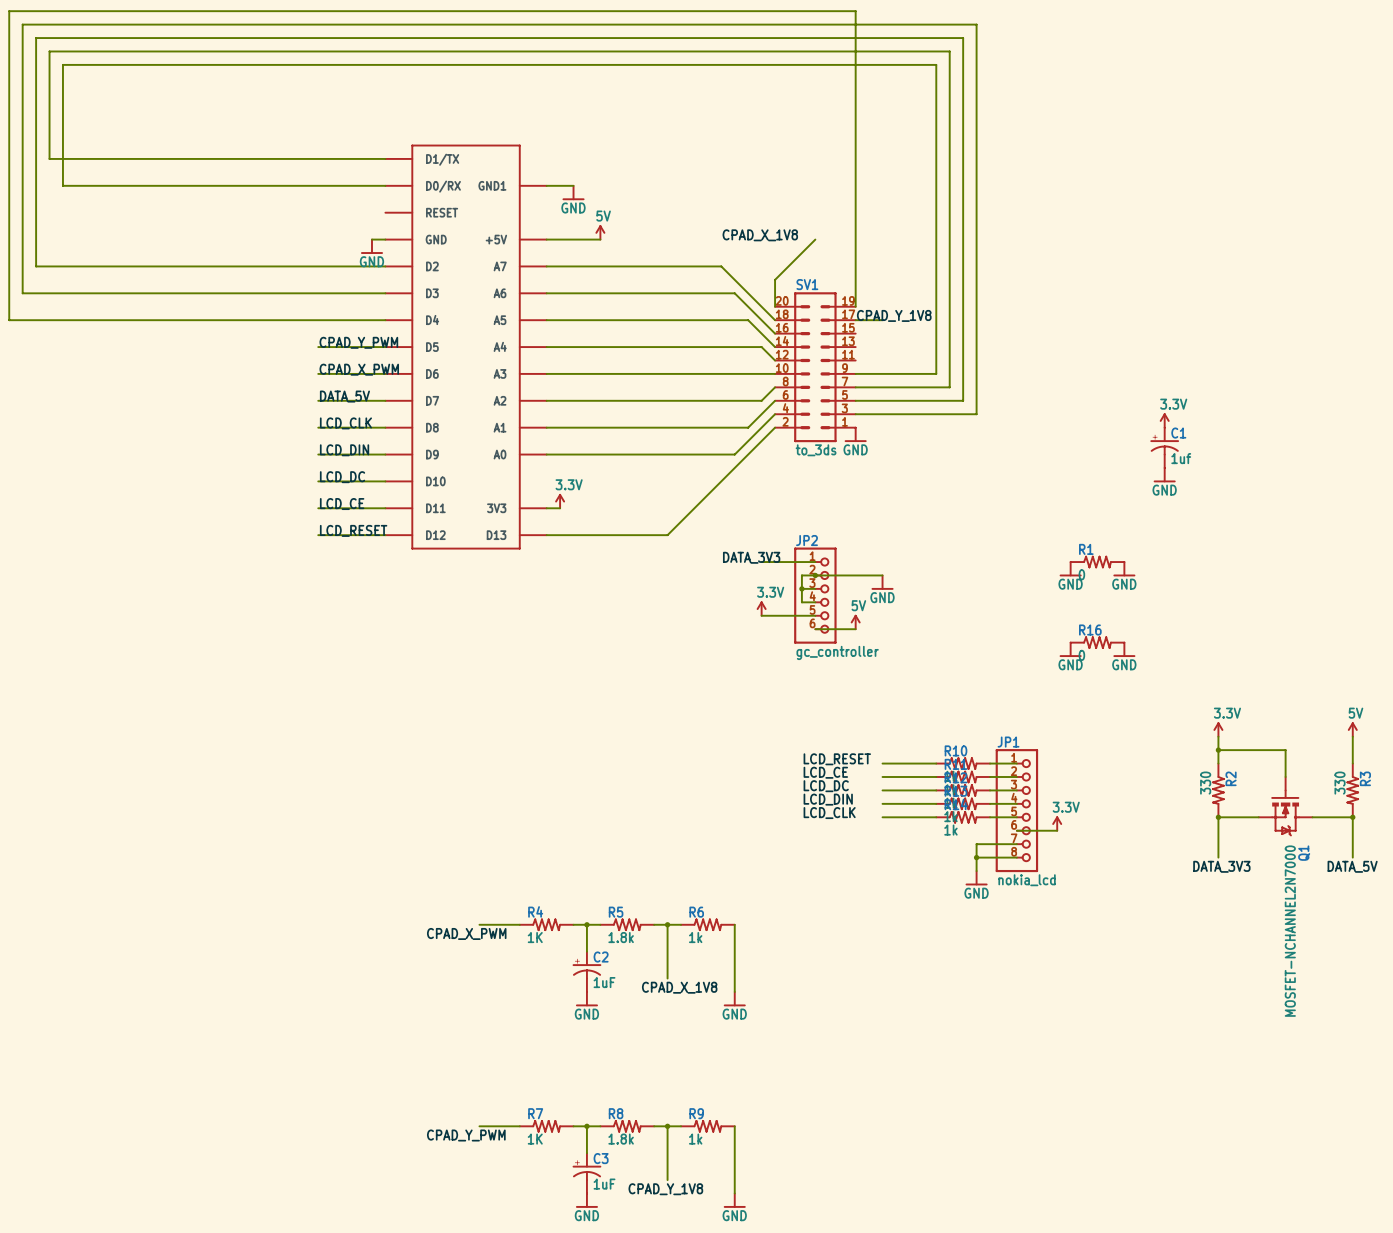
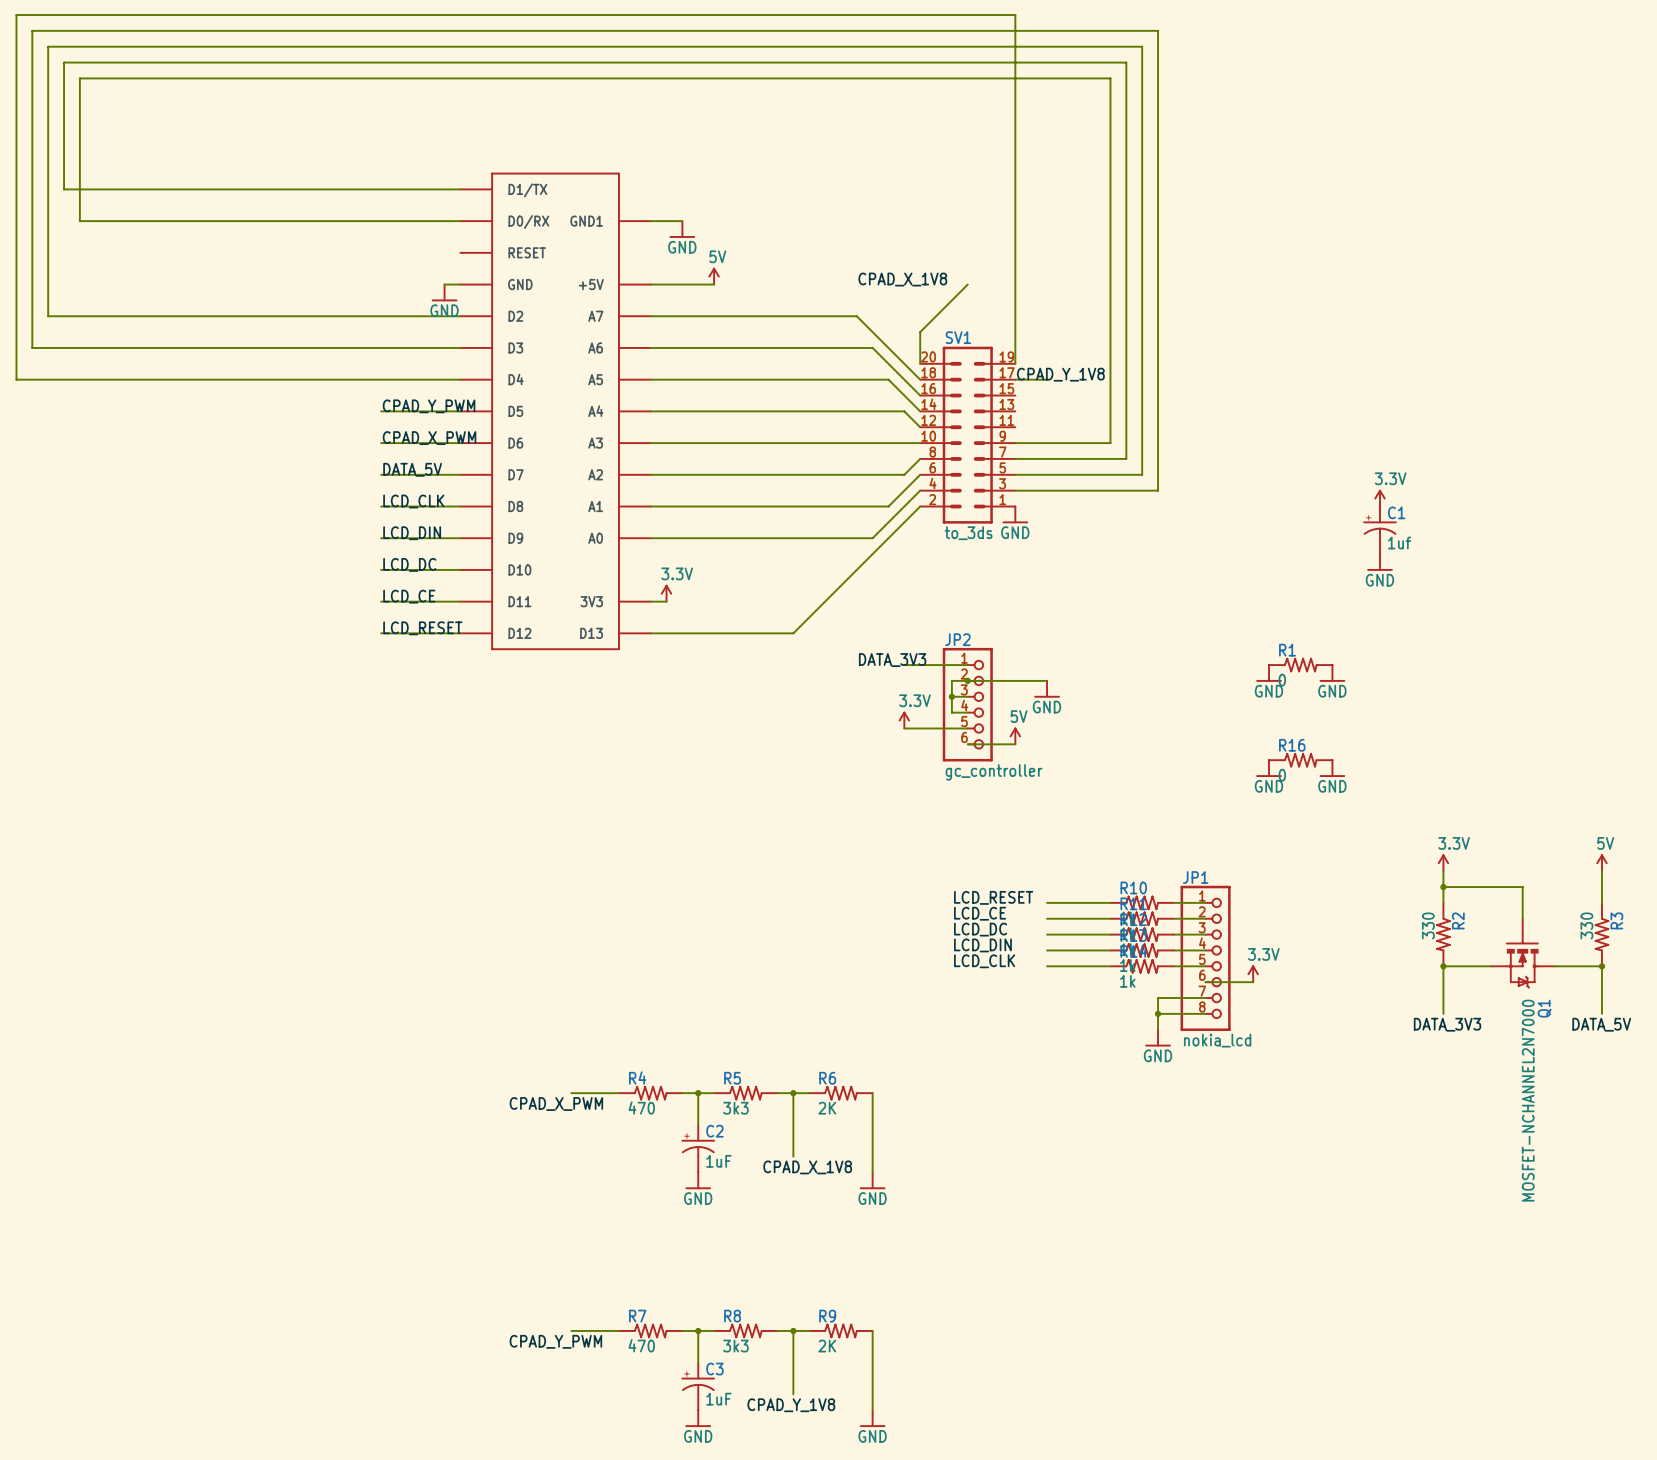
R4 value: 1K (535, 937) -> 470 (641, 1107)
R5 value: 1.8k (621, 937) -> 3k3 (735, 1108)
R6 value: 1k (695, 937) -> 2K (827, 1108)
R7 value: 1K (535, 1139) -> 470 (641, 1345)
R8 value: 1.8k (621, 1139) -> 3k3 (735, 1346)
R9 value: 1k (695, 1139) -> 2K (827, 1346)

